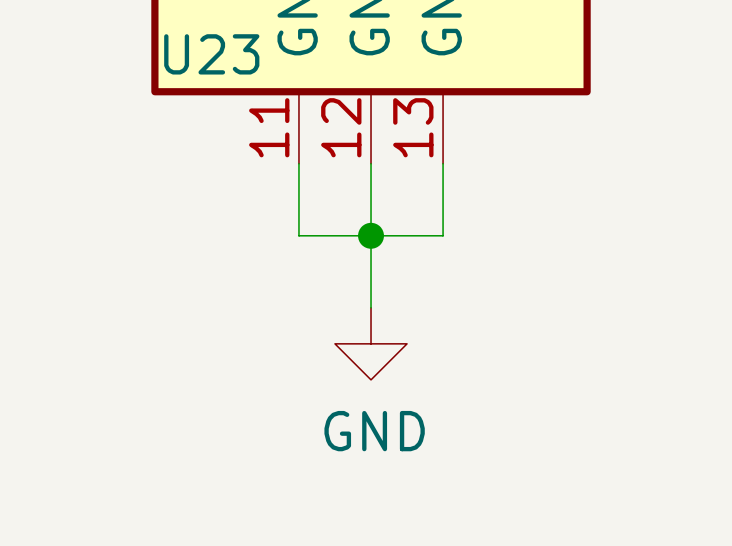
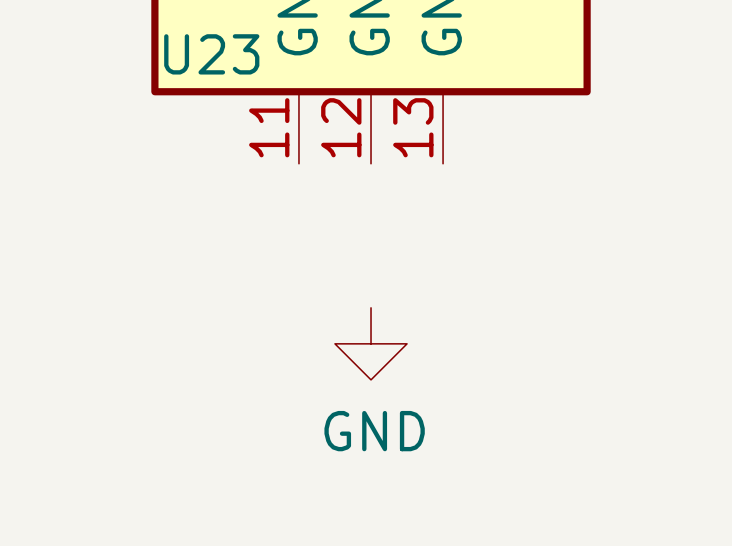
wire: (298, 163) (298, 235) (443, 235) (443, 163) -> none
wire: (371, 163) (371, 307) -> none
junction: (371, 235) -> none

